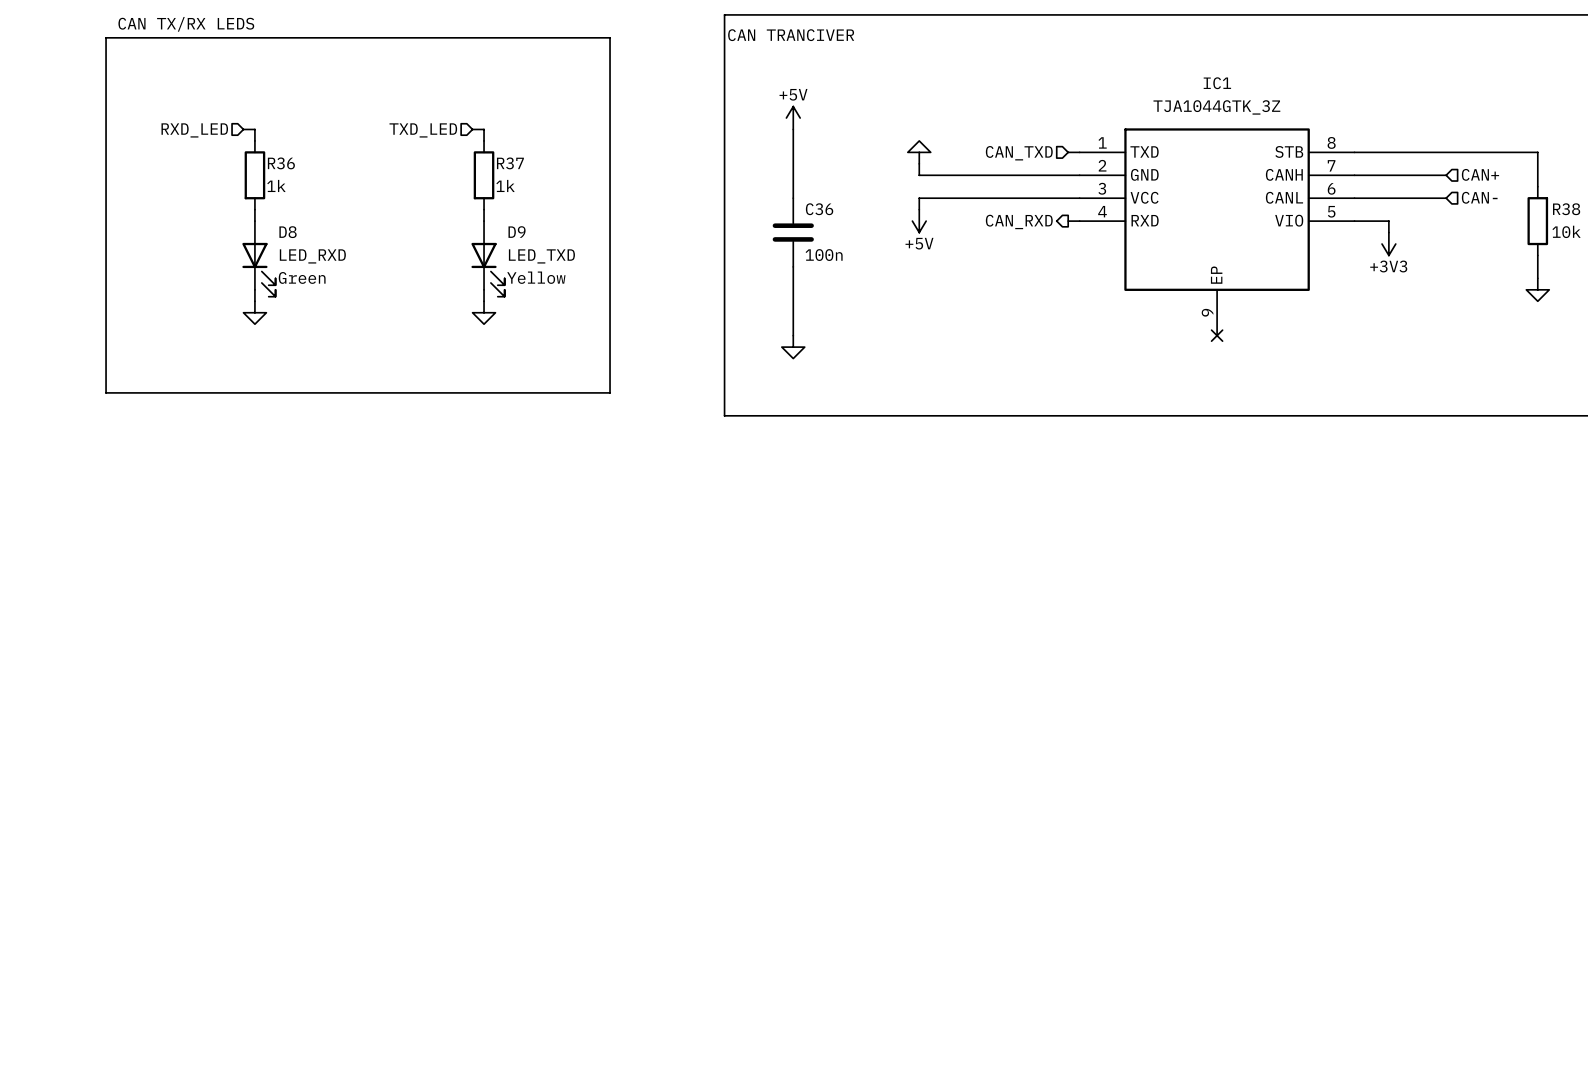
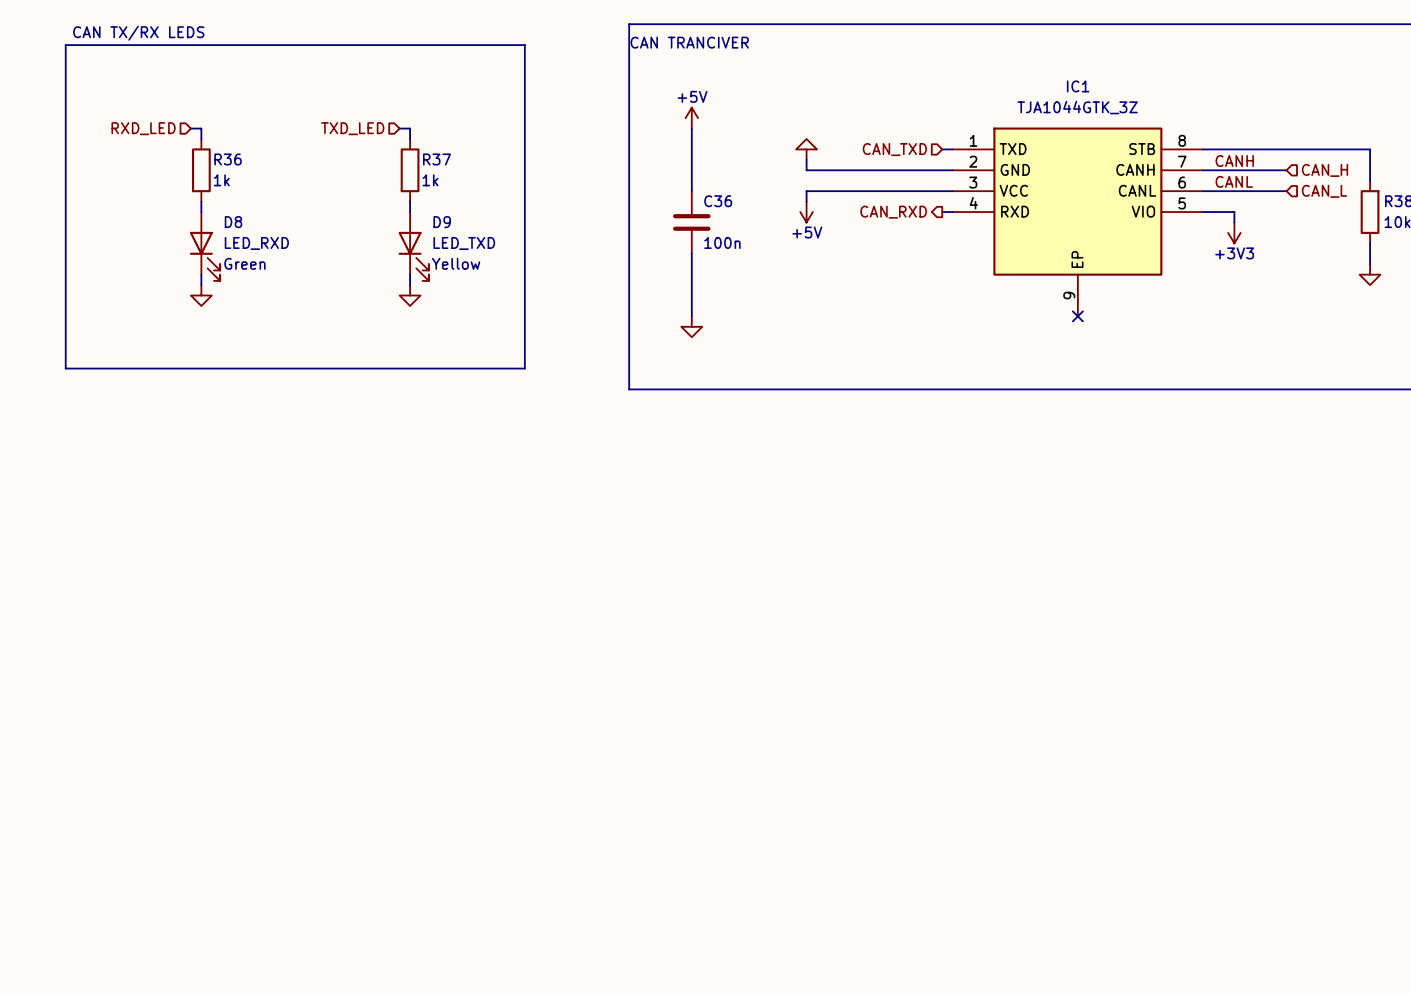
label: none -> CANH (1234, 160)
hierarchical label: CAN+ (1480, 174) -> CAN_H (1324, 170)
label: none -> CANL (1234, 181)
hierarchical label: CAN- (1479, 197) -> CAN_L (1324, 191)

